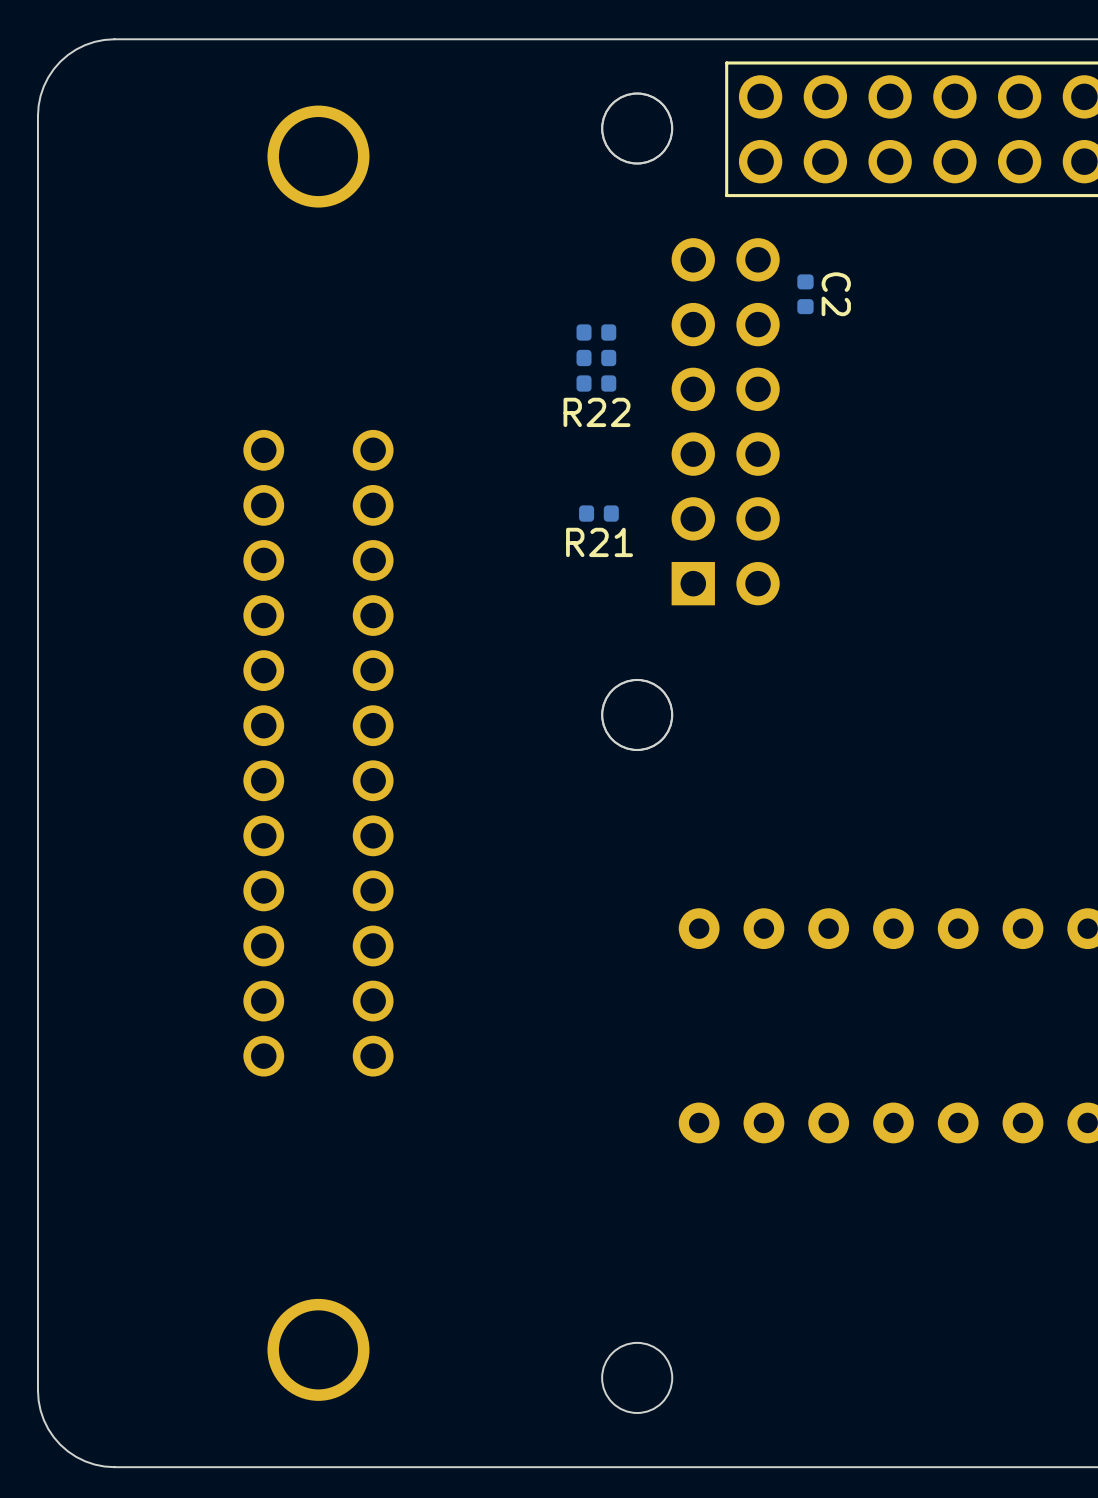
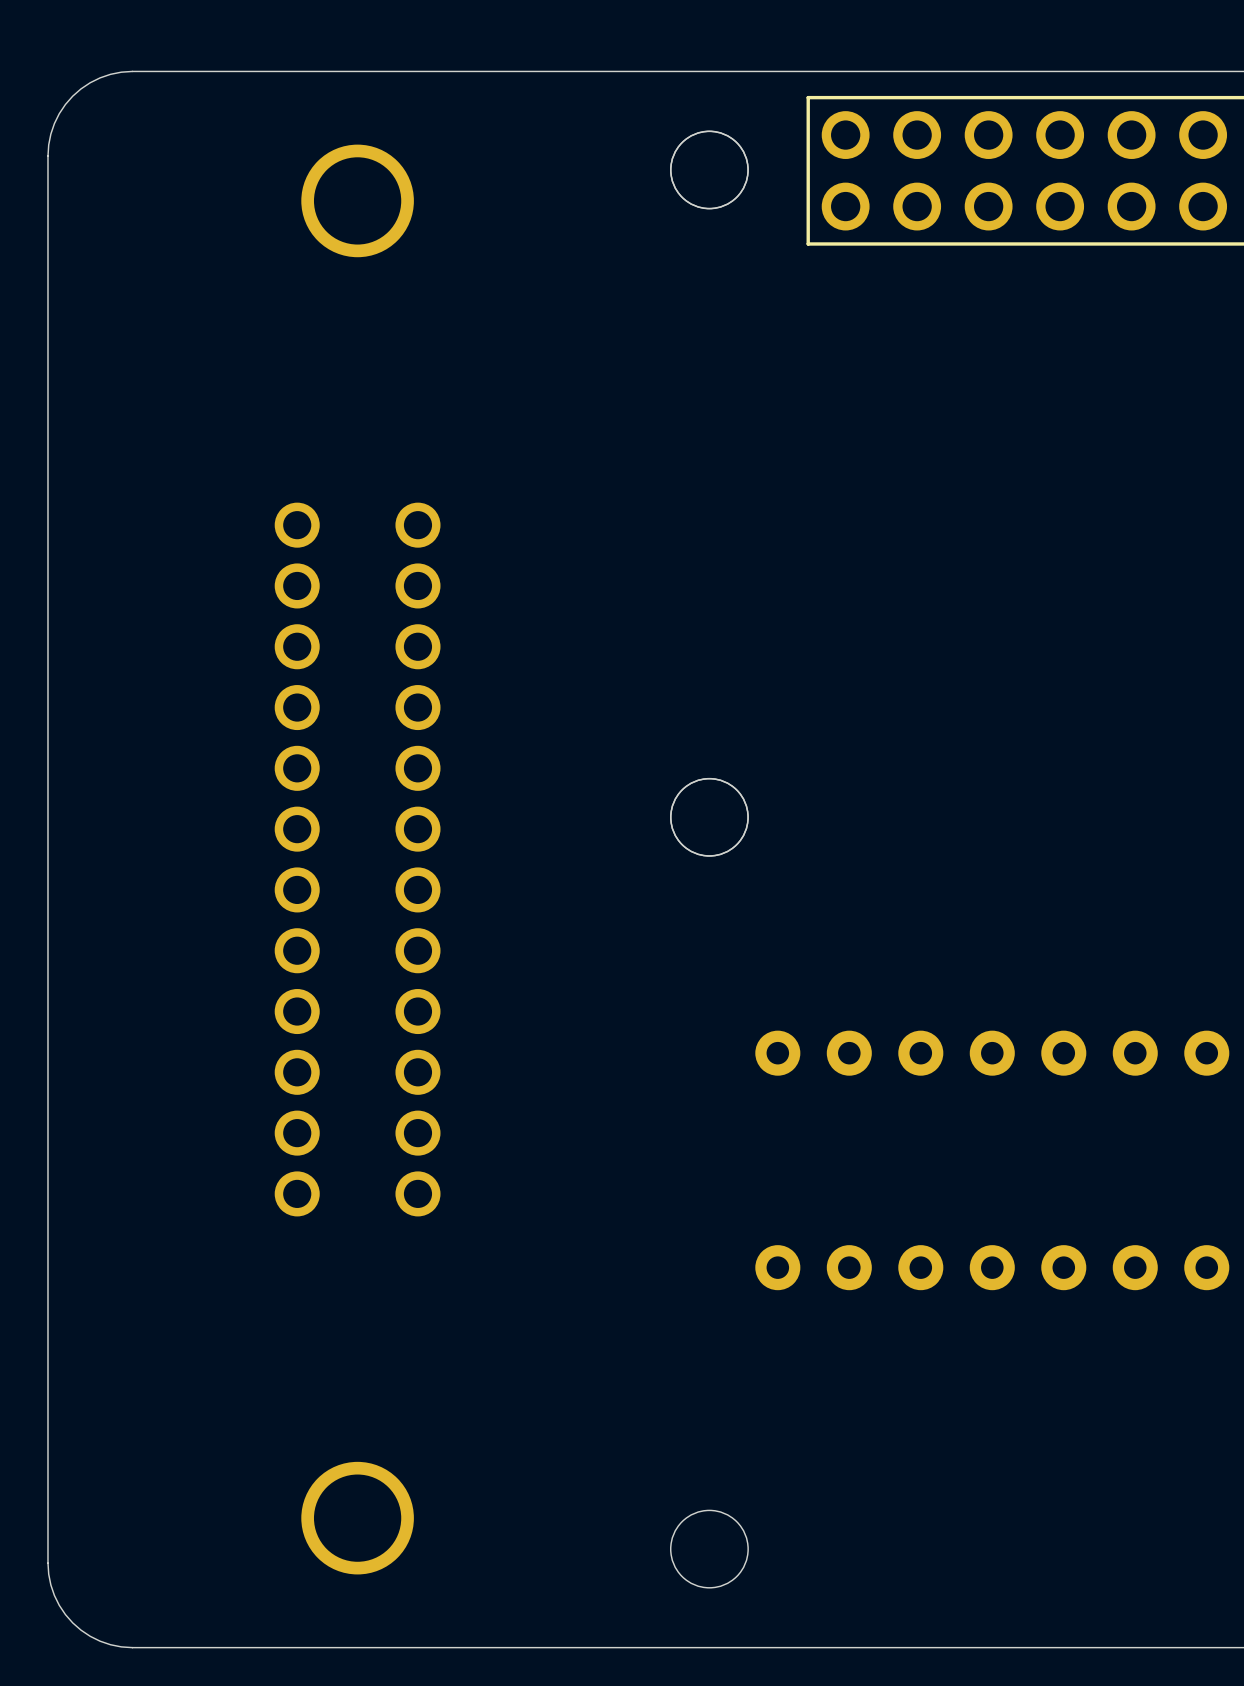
C2: (805, 294) -> none
part: (596, 332) -> none
part: (596, 358) -> none
R22: (596, 383) -> none
part: (725, 421) -> none
R21: (598, 513) -> none

